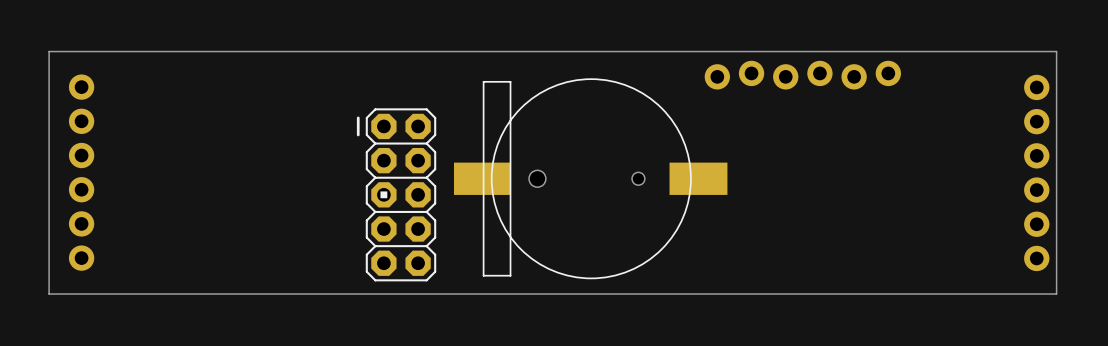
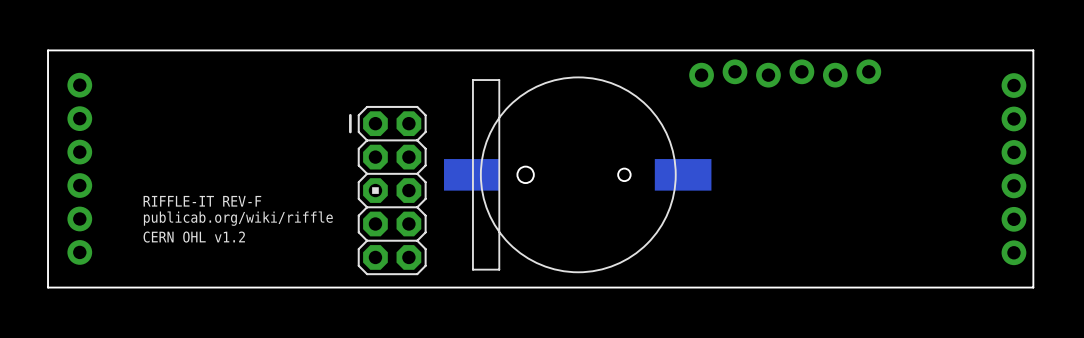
text: none -> RIFFLE-IT REV-F (202, 201)
text: none -> publicab.org/wiki/riffle (238, 218)
text: none -> CERN OHL v1.2 (194, 237)

